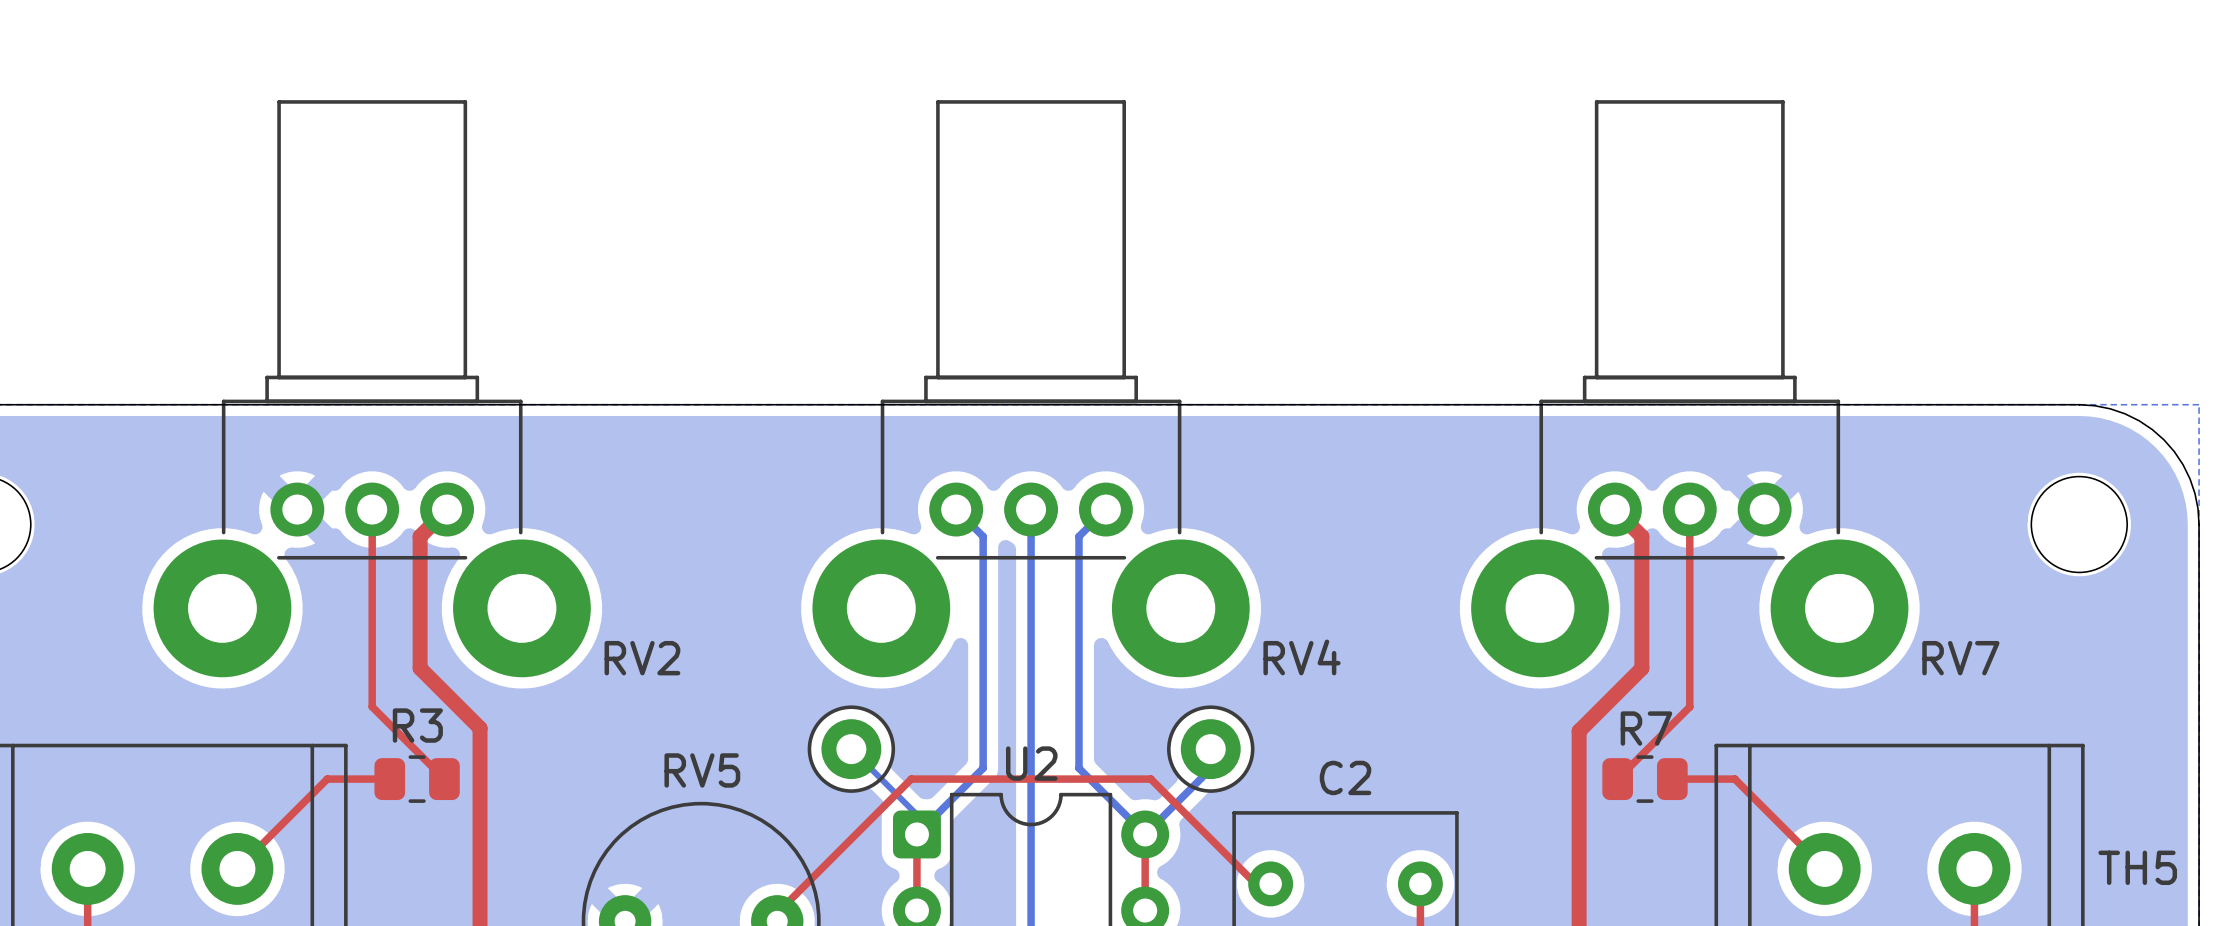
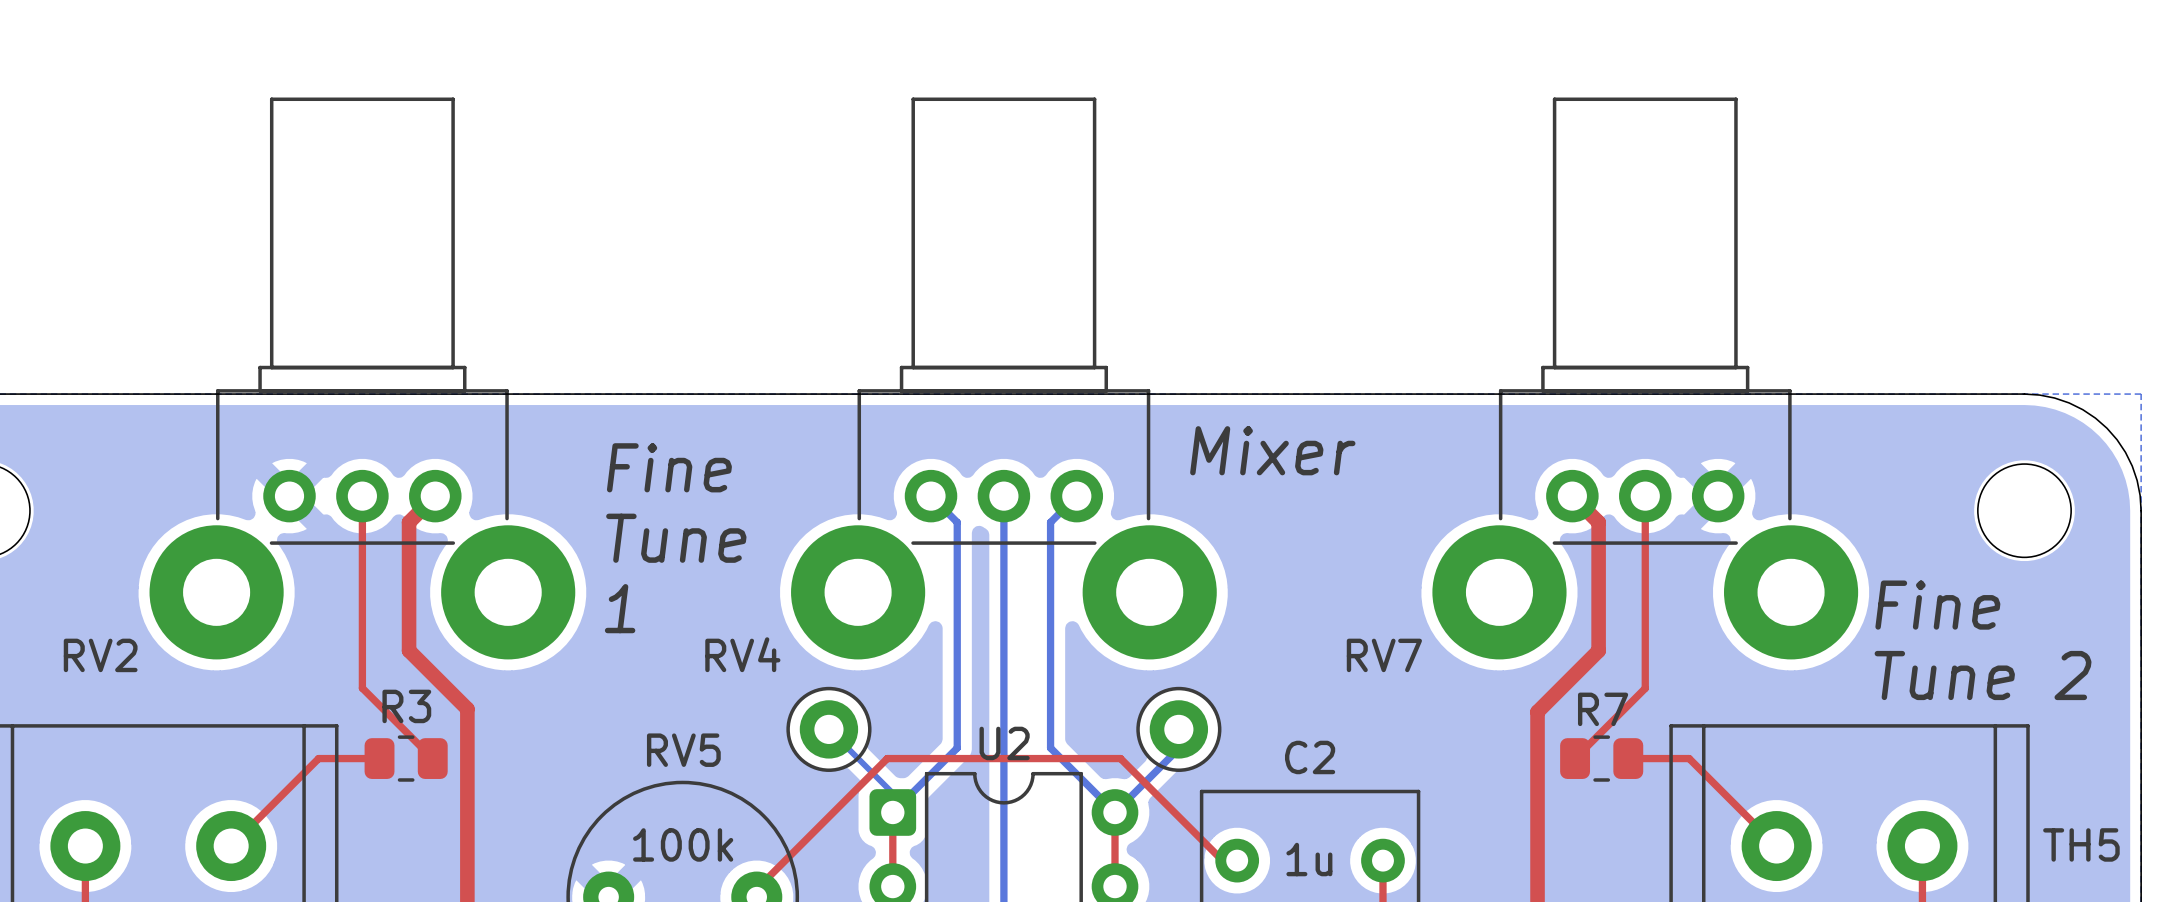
text: none -> Mixer (1272, 450)
text: none -> Fine (669, 467)
text: none -> Tune (676, 538)
text: none -> Fine (1937, 605)
text: none -> 1 (620, 608)
RV4 name position: RV4 (1302, 657) -> RV4 (742, 654)
RV2 name position: RV2 (642, 658) -> RV2 (100, 655)
RV7 name position: RV7 (1960, 658) -> RV7 (1384, 655)
text: none -> Tune 2 (1983, 675)
RV5 value: none -> 100k (683, 844)
C2 value: none -> 1u (1309, 859)

